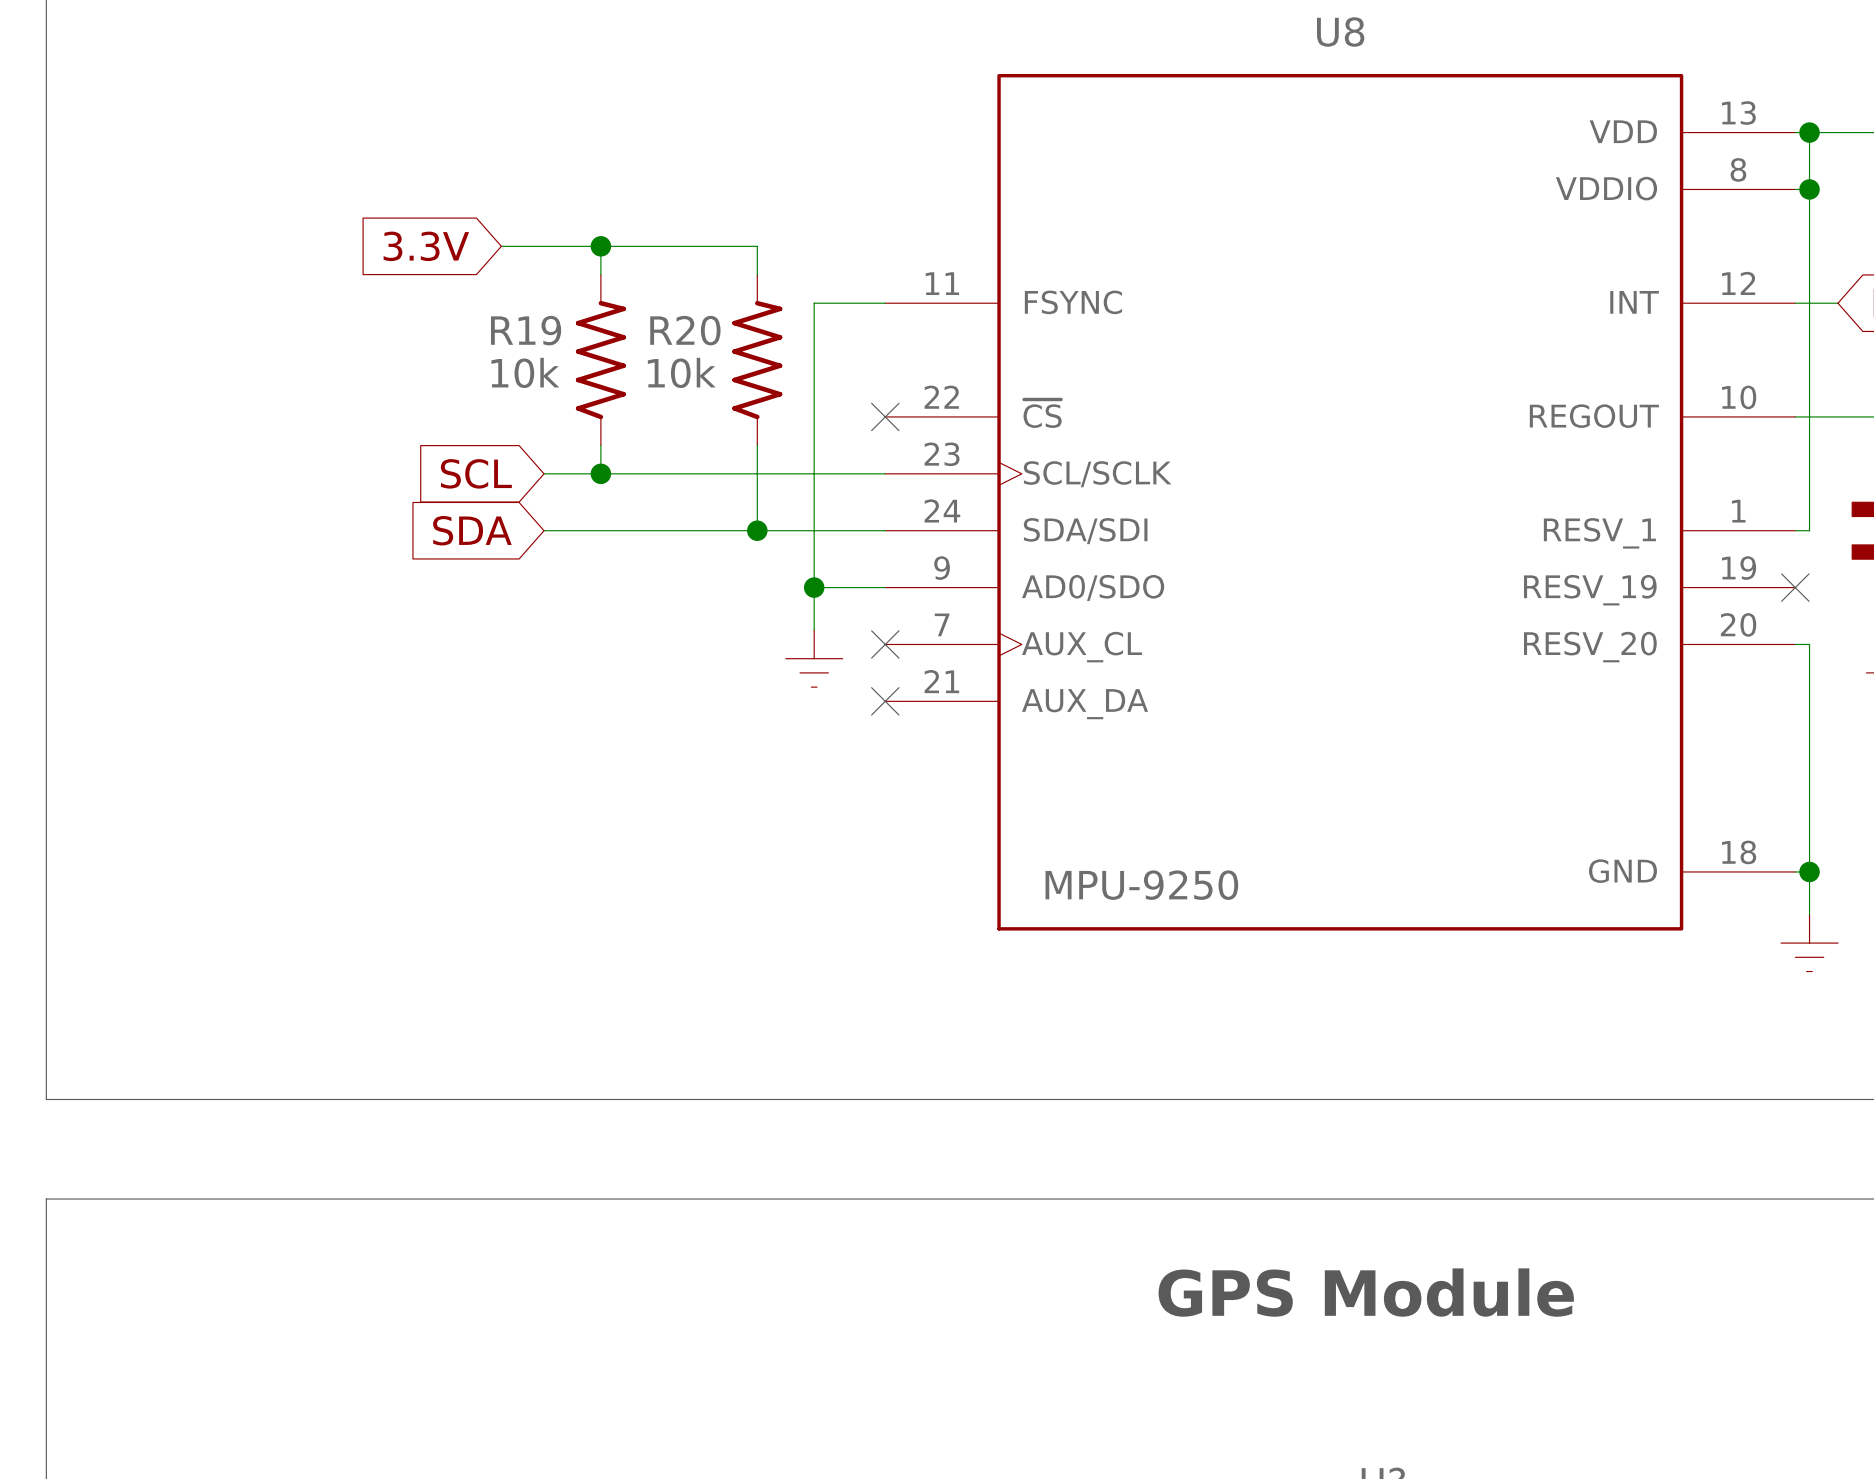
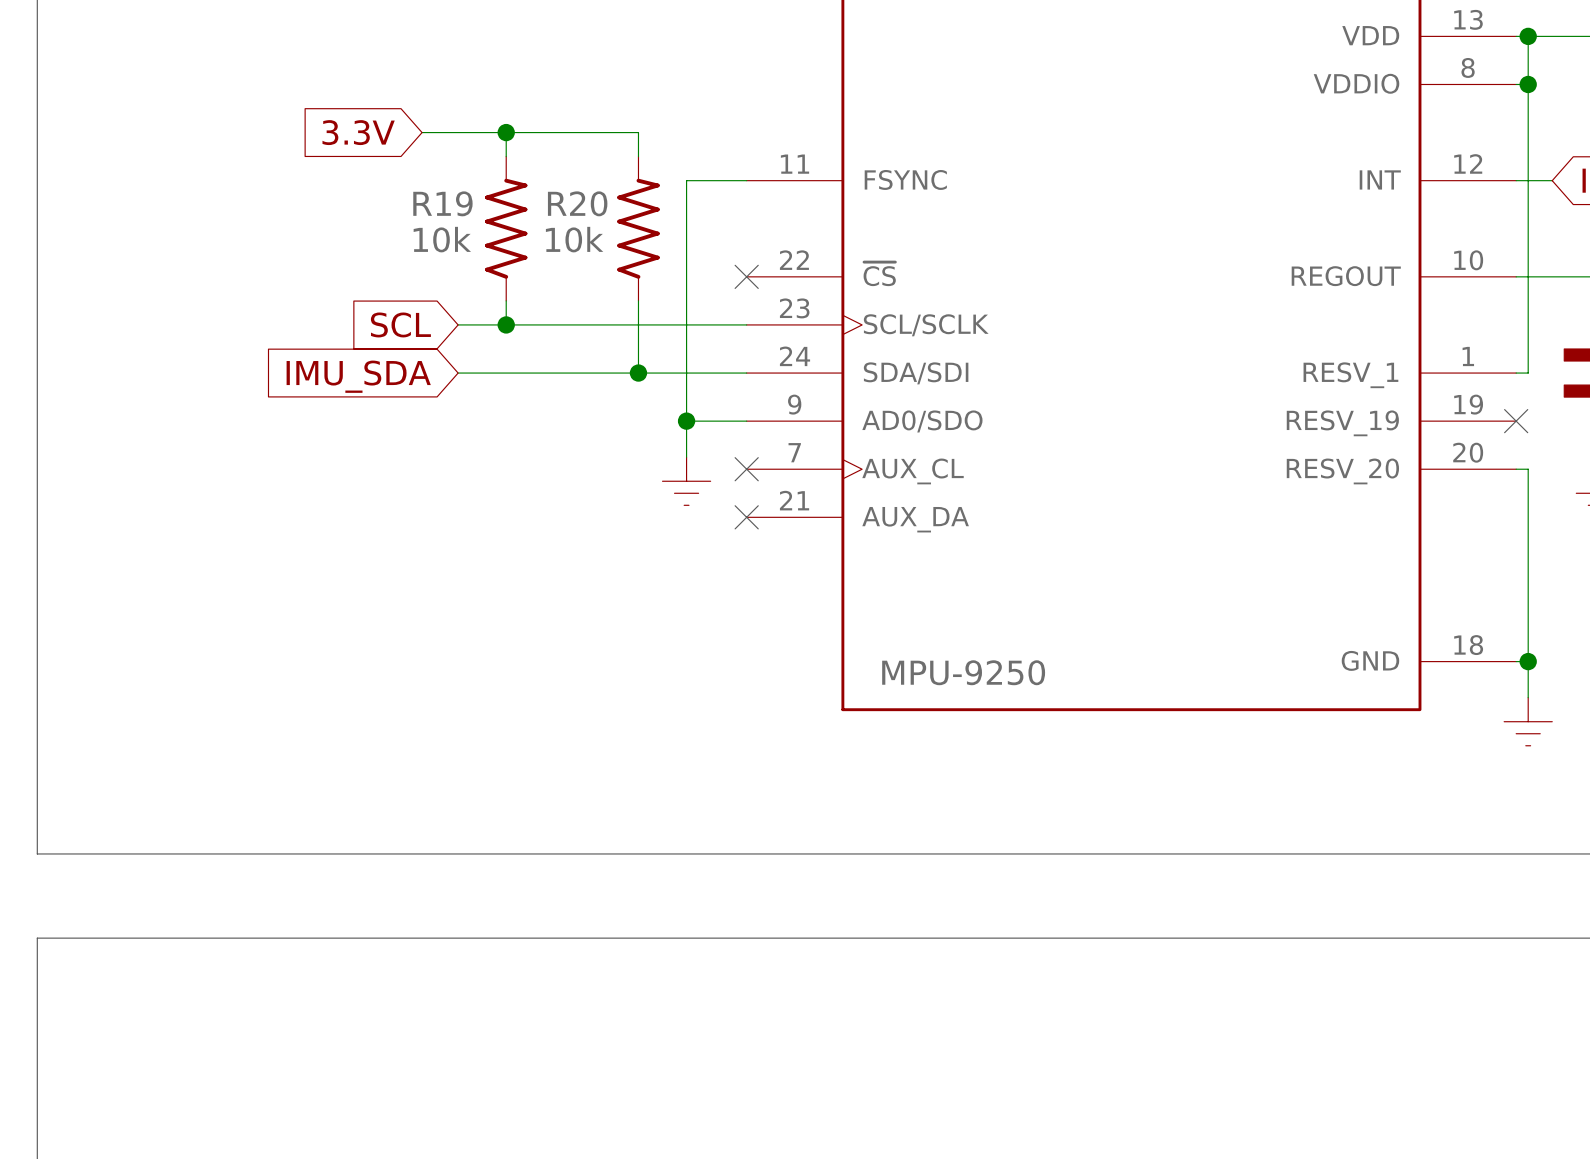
global label: SDA (472, 530) -> IMU_SDA (358, 376)
text: GPS Module (1366, 1292) -> none

